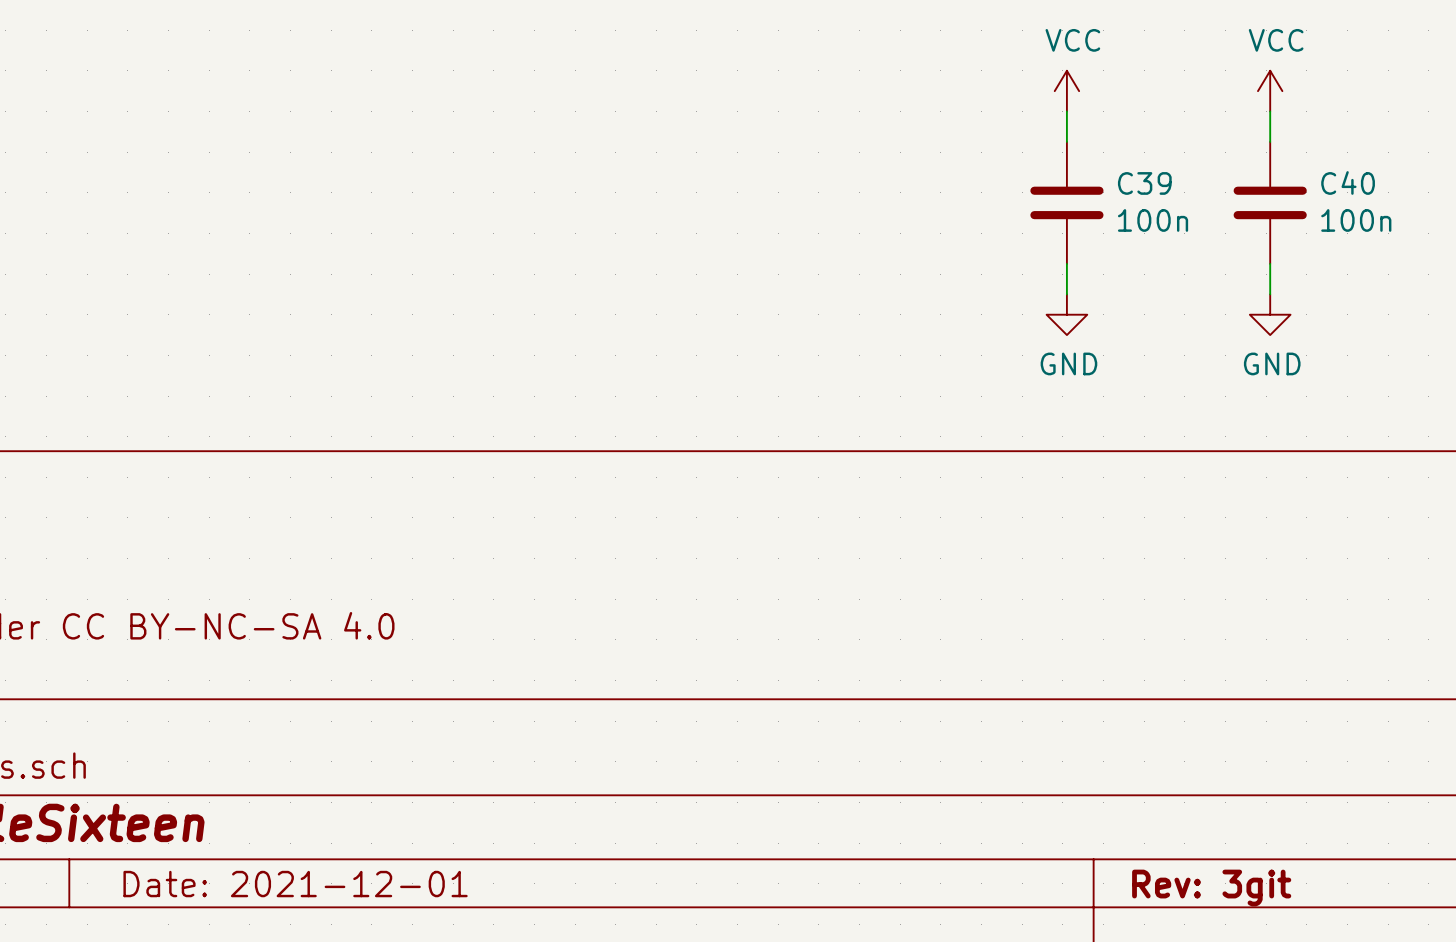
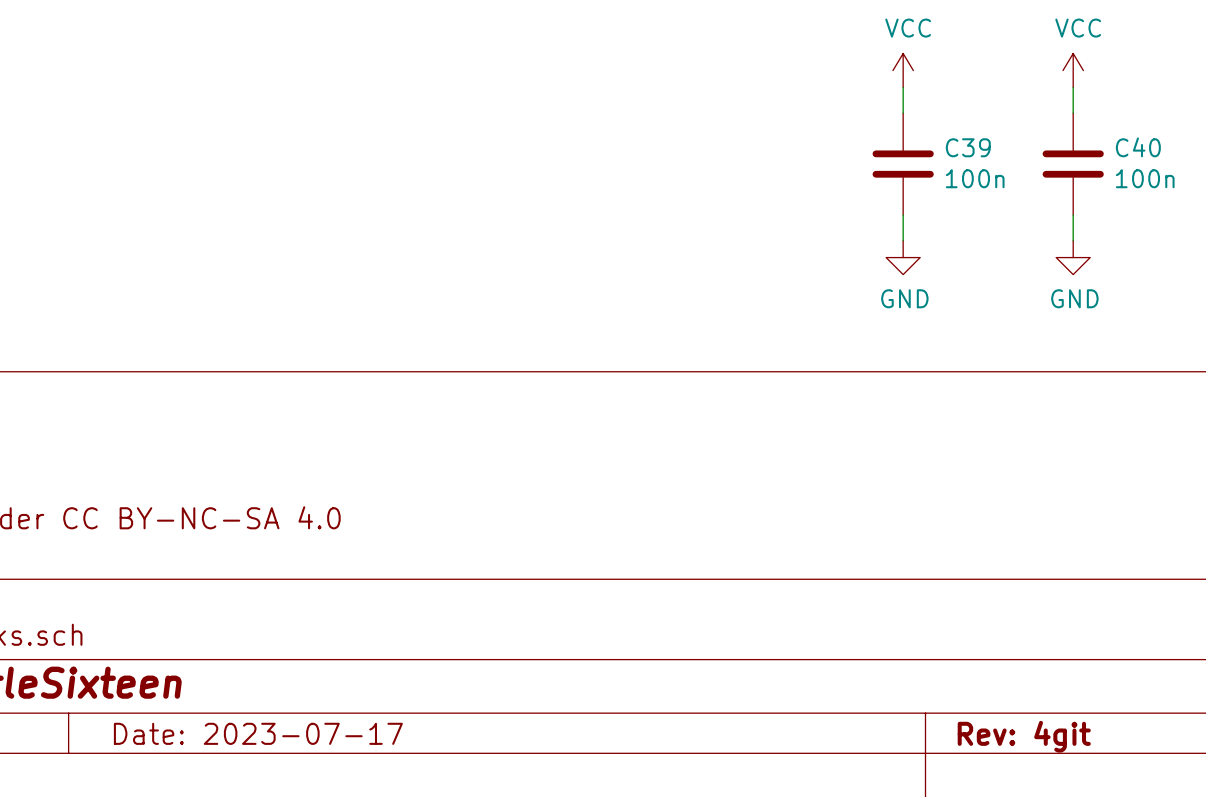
title block: Date: 2021-12-01 (295, 884) -> Date: 2023-07-17 (258, 733)
title block: Rev: 3git (1211, 888) -> Rev: 4git (1024, 736)

